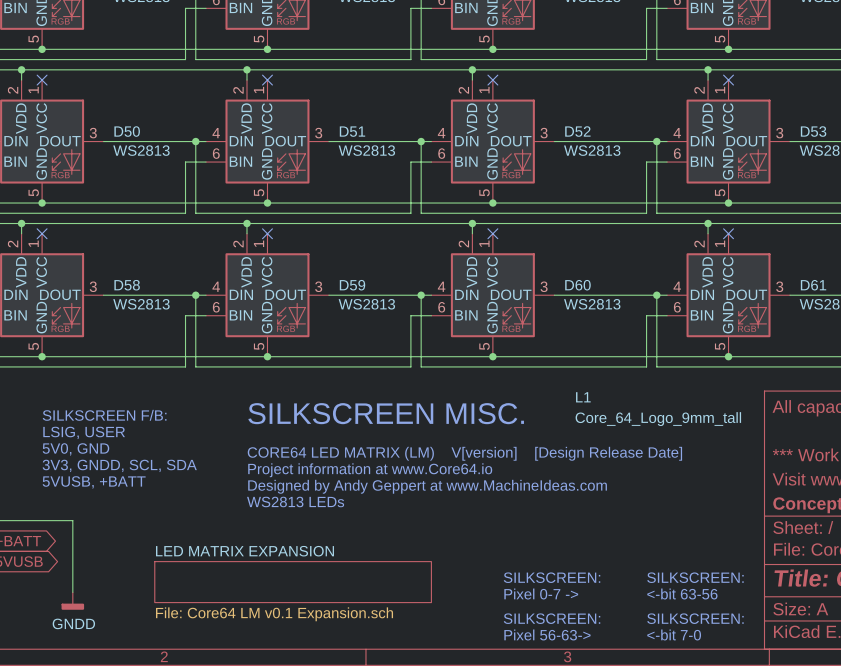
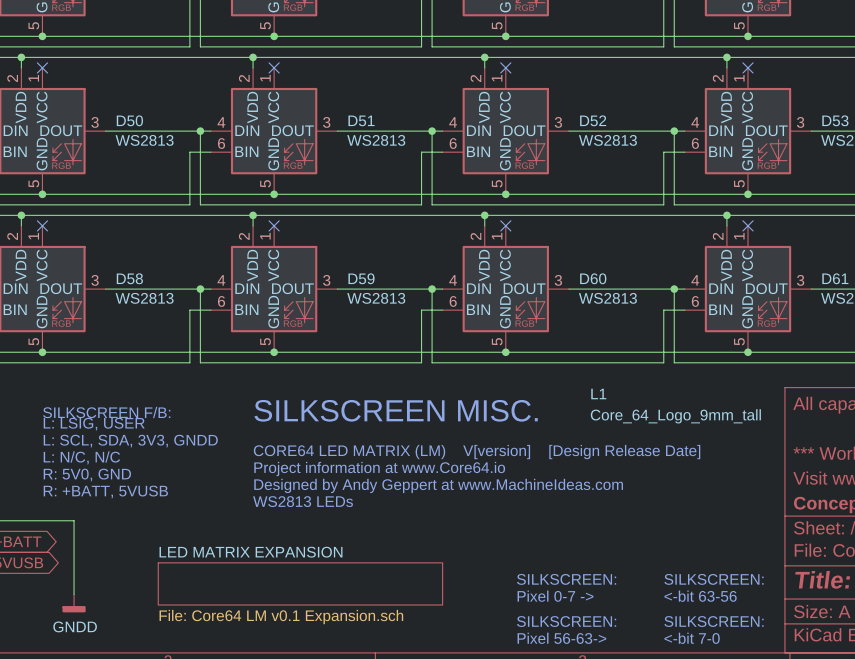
text: LSIG, USER (84, 432) -> L: LSIG, USER (94, 424)
text: none -> L: SCL, SDA, 3V3, GNDD (130, 441)
text: 5V0, GND (75, 449) -> none
text: none -> L: N/C, N/C (81, 457)
text: 3V3, GNDD, SCL, SDA (119, 465) -> none
text: none -> R: 5V0, GND (87, 475)
text: 5VUSB, +BATT (94, 482) -> none
text: none -> R: +BATT, 5VUSB (105, 491)

